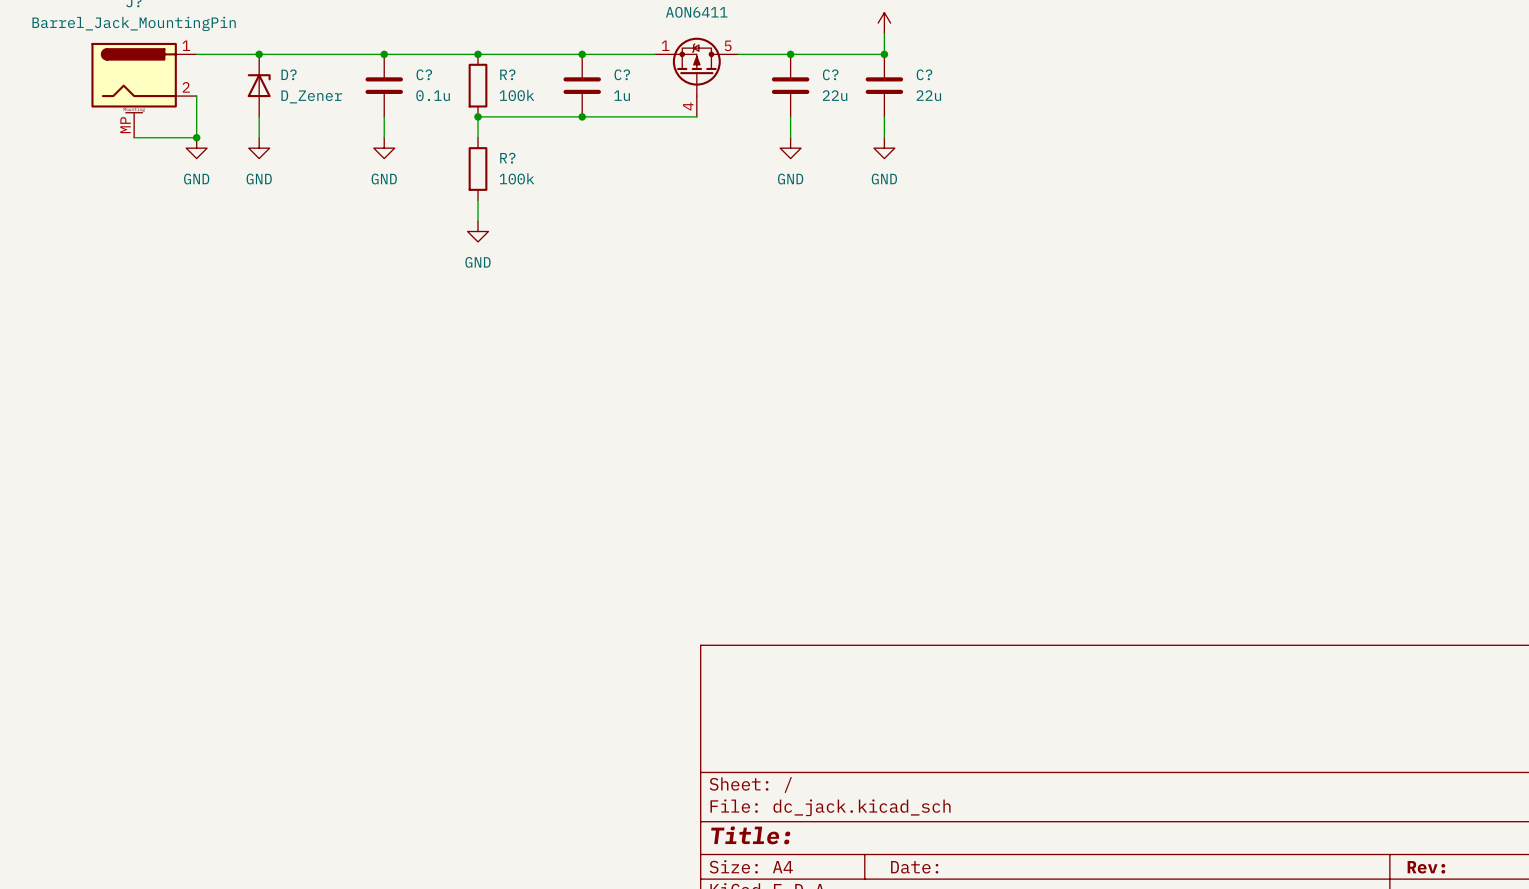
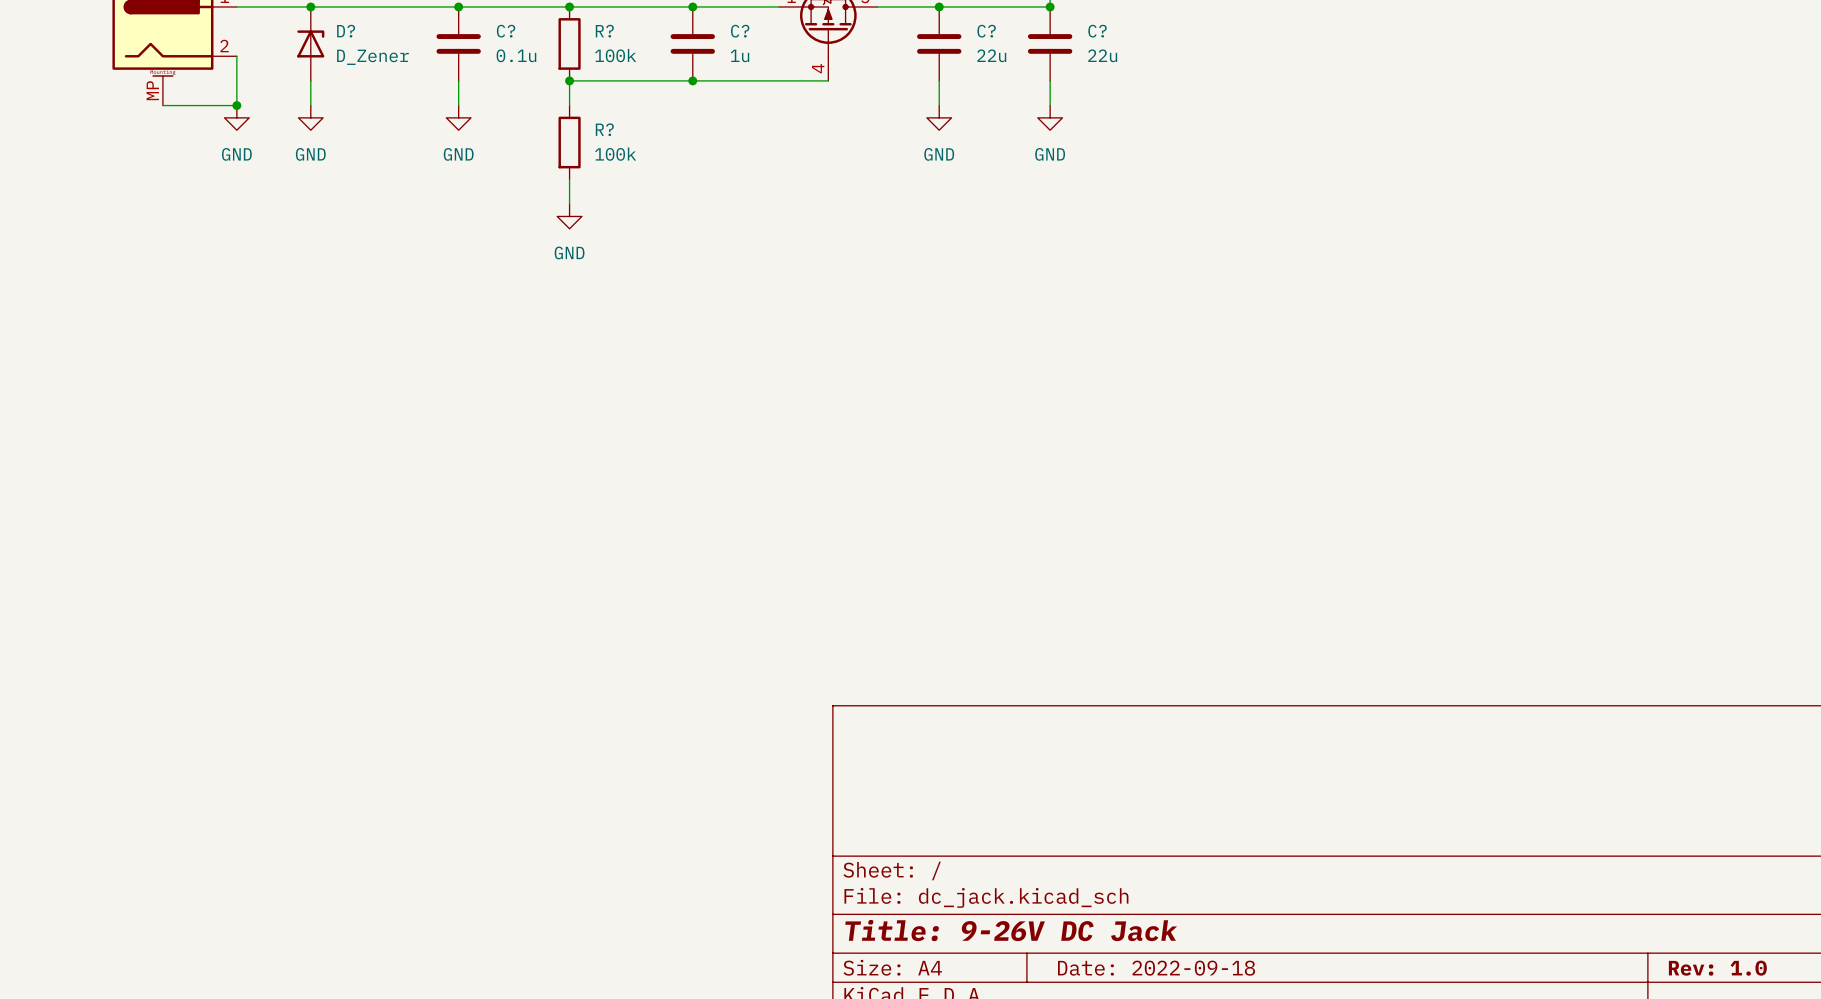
title block: Title: (750, 835) -> Title: 9-26V DC Jack (1011, 930)
title block: Date: (914, 867) -> Date: 2022-09-18 (1156, 968)
title block: Rev: (1426, 867) -> Rev: 1.0 (1717, 968)

